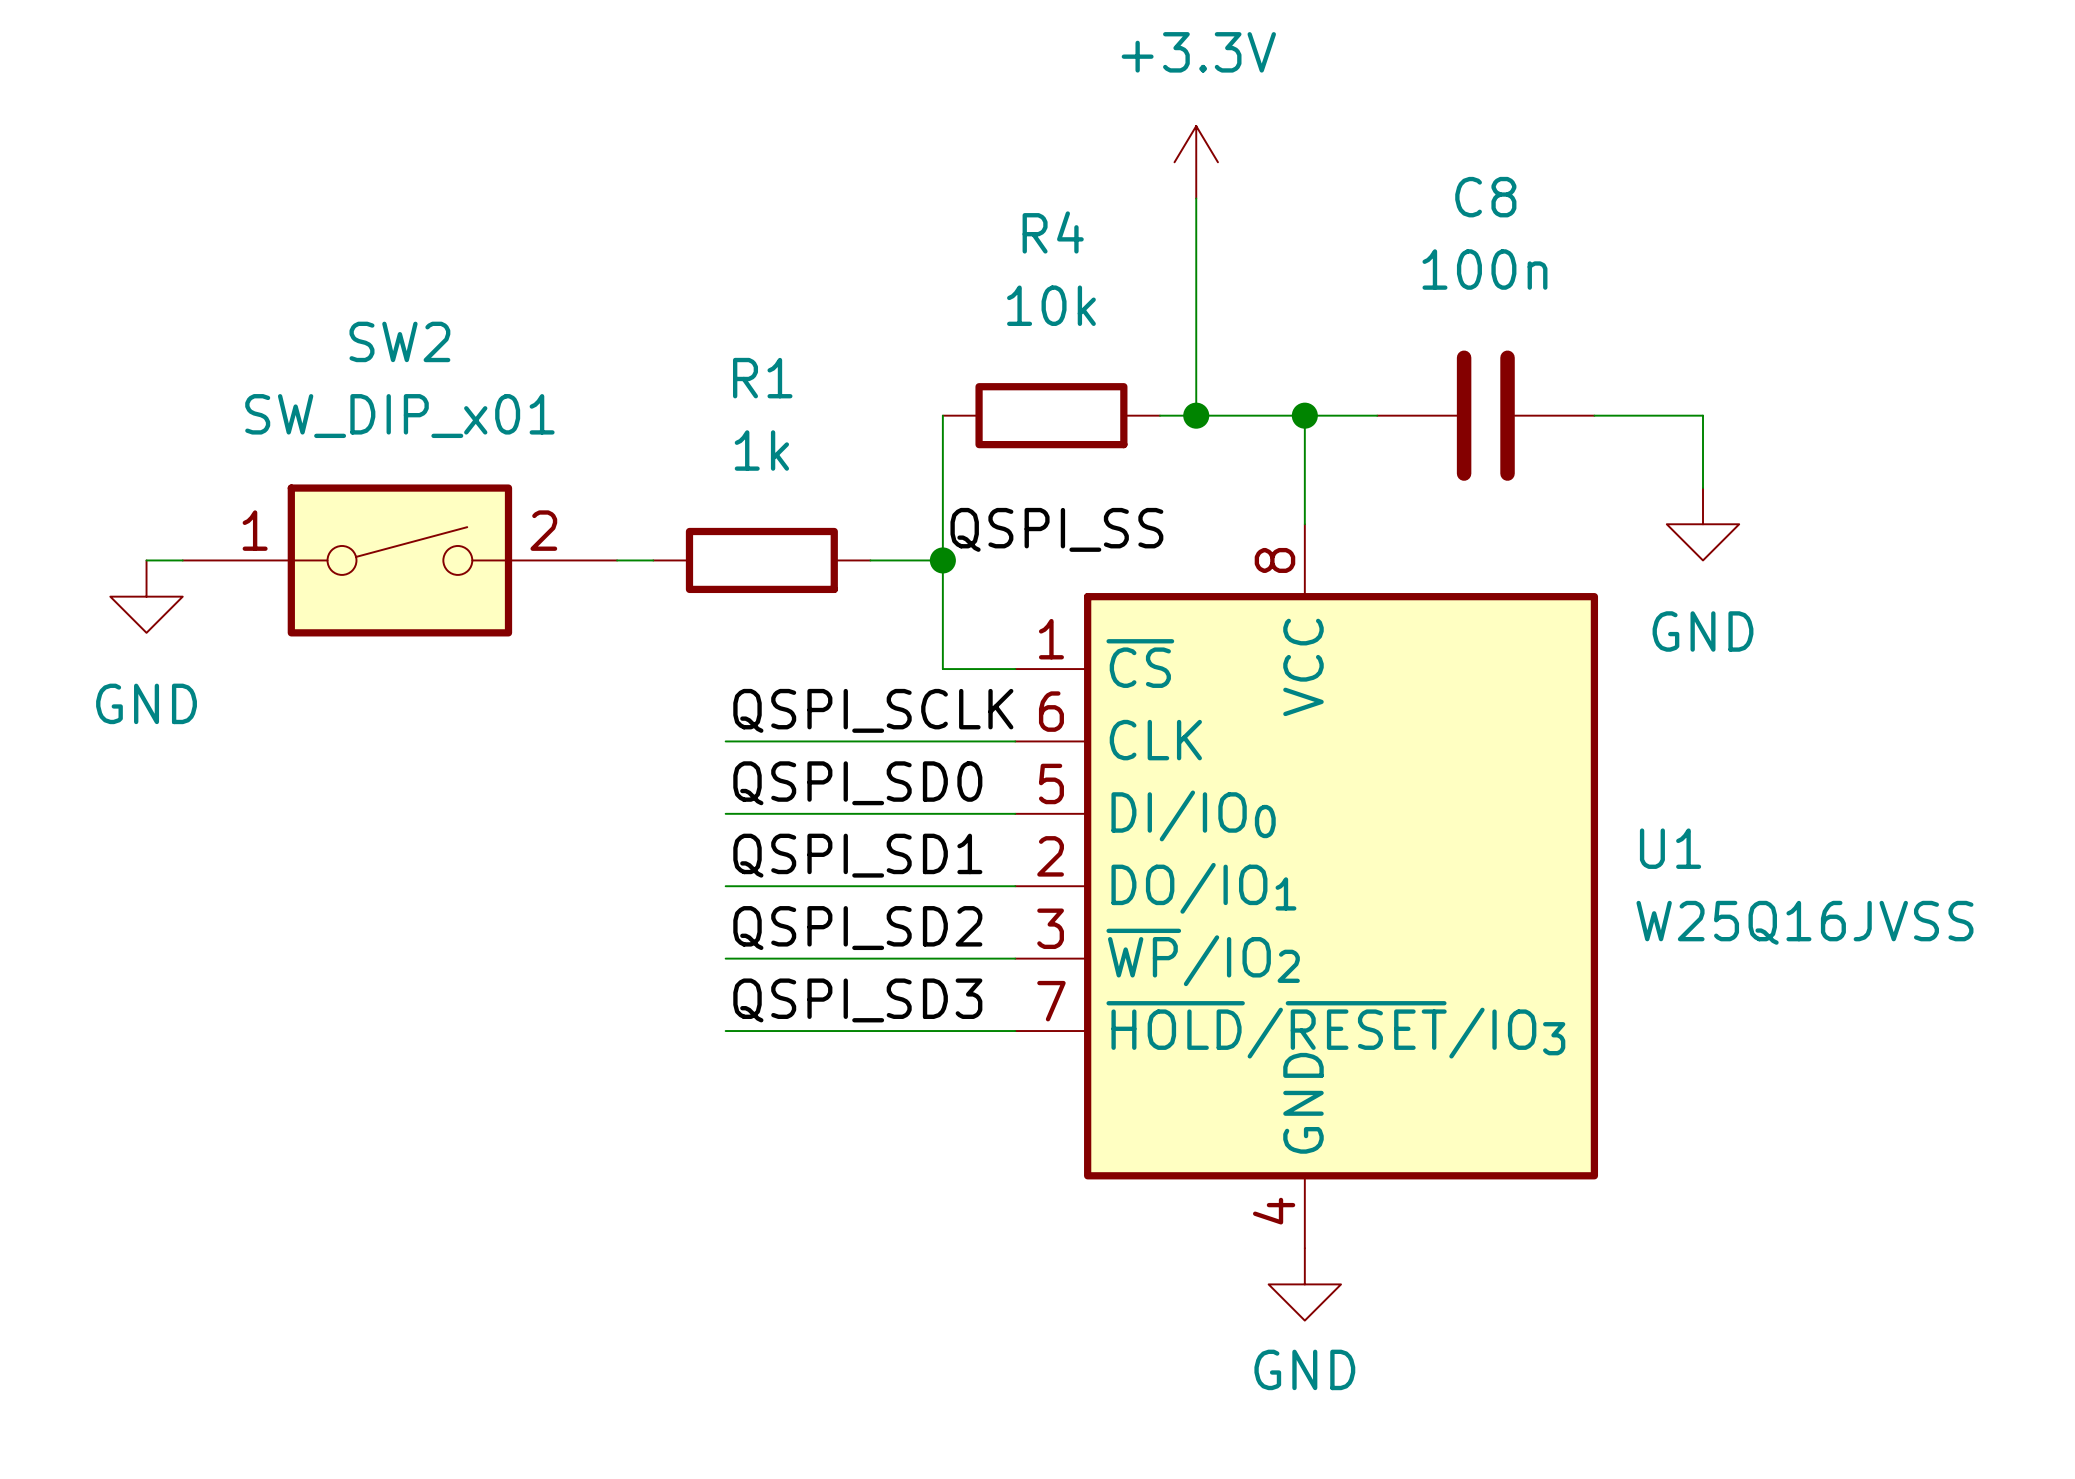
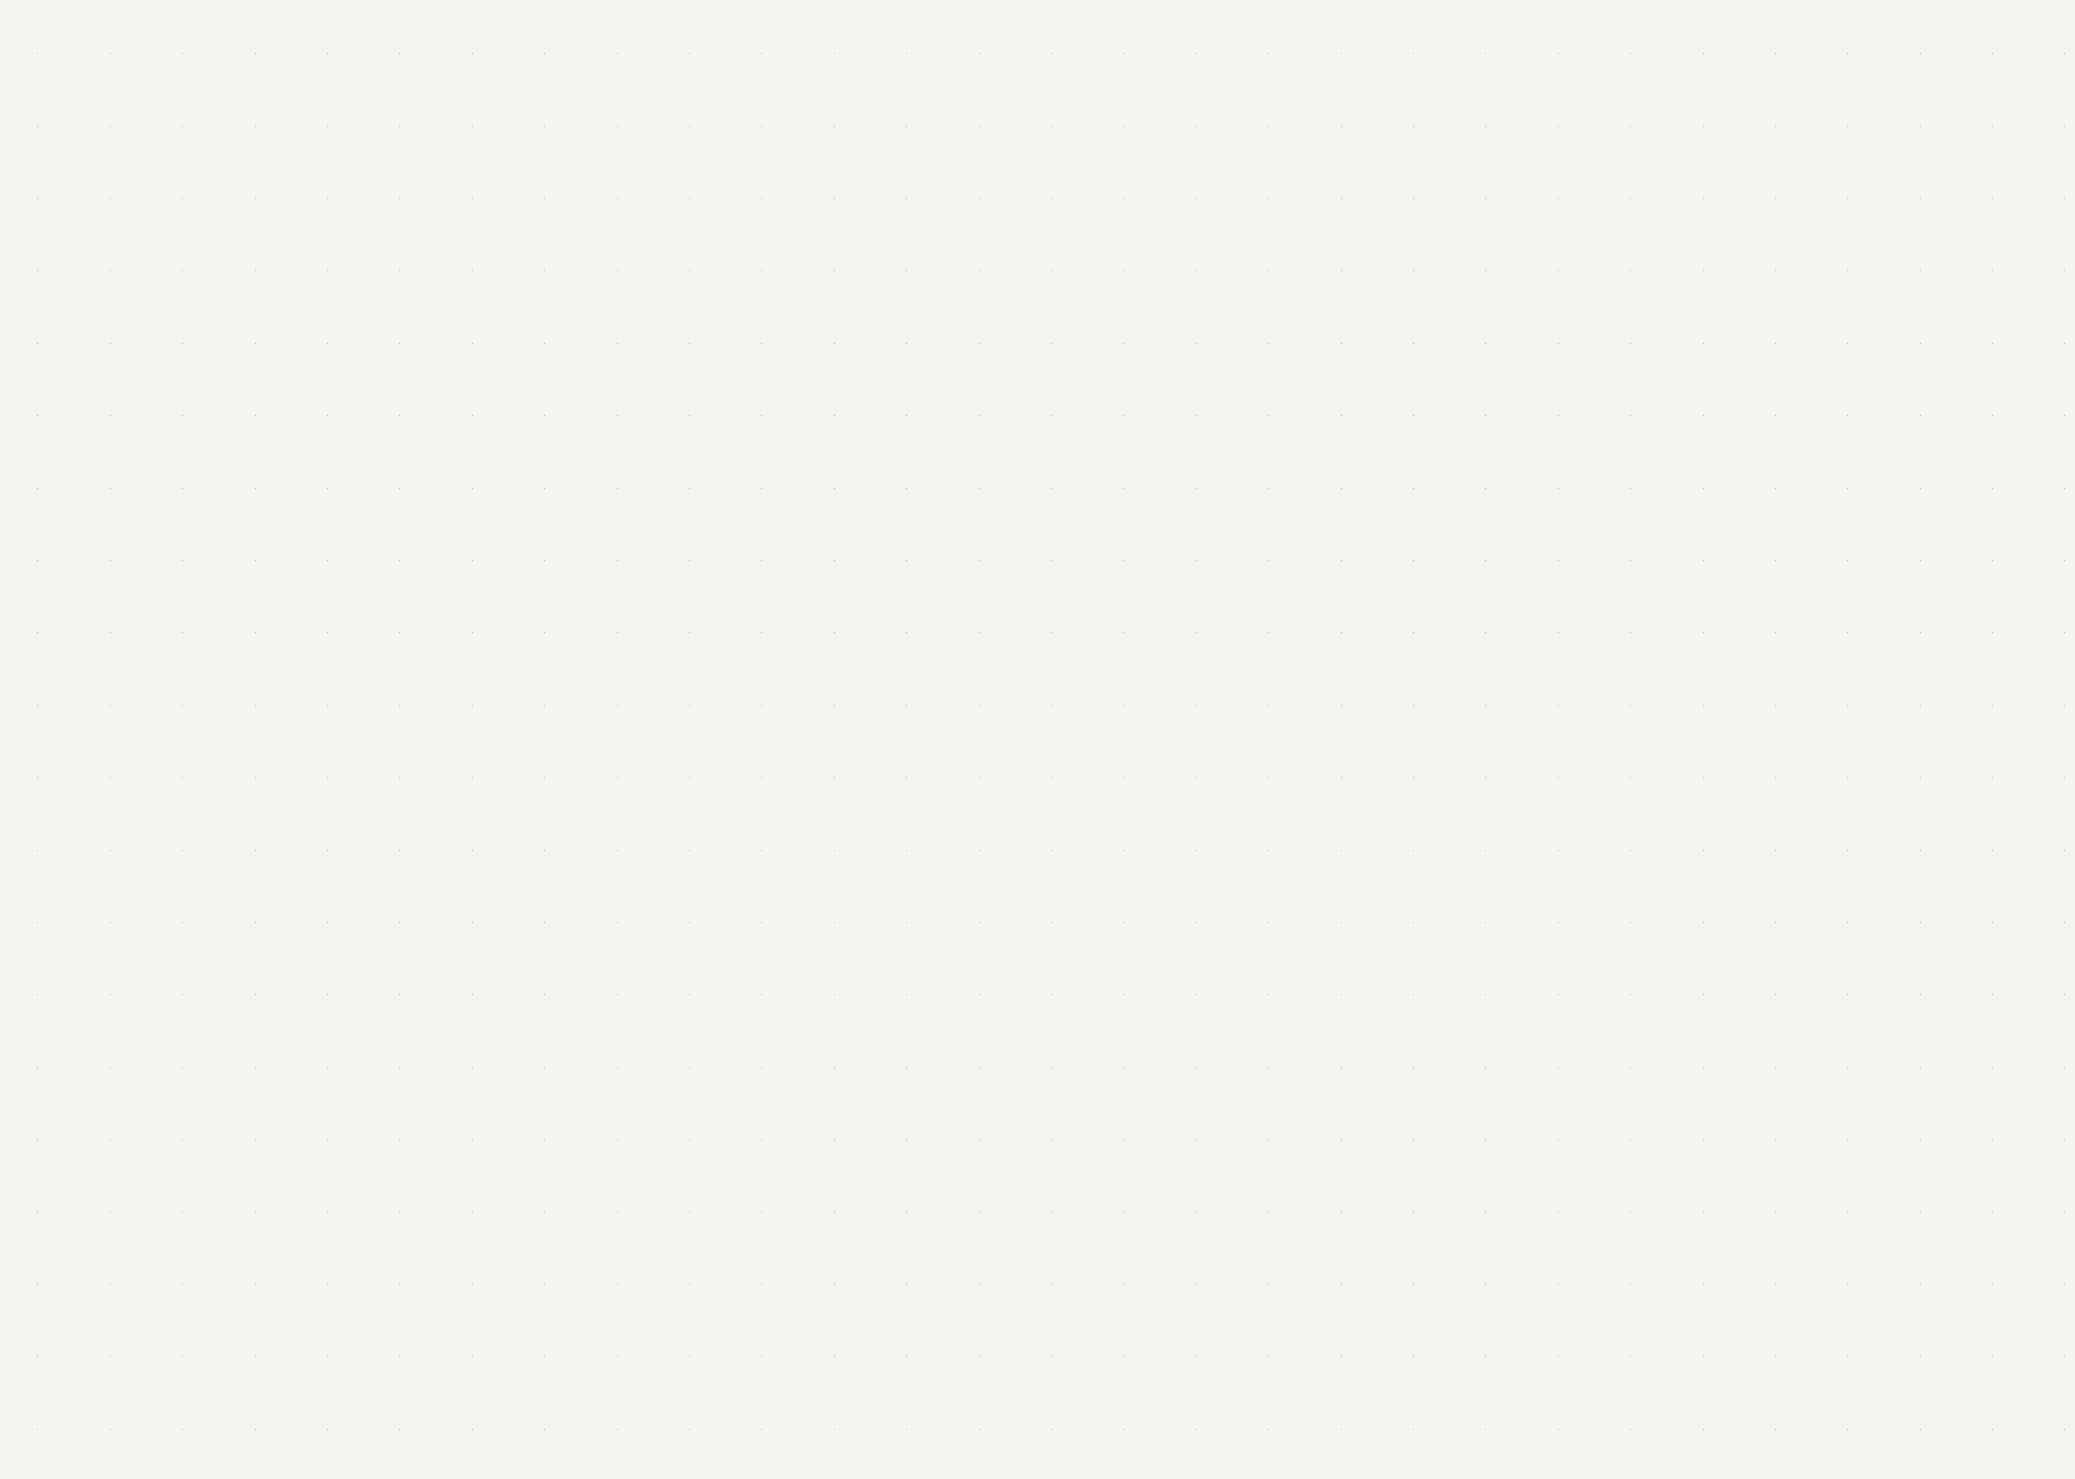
power symbol: +3.3V (1196, 162) -> none
wire: (1196, 198) (1196, 415) -> none
wire: (942, 415) (942, 669) (1015, 669) -> none
R4: 10k (1051, 415) -> none
wire: (1160, 415) (1377, 415) -> none
junction: (1196, 415) -> none
wire: (1304, 415) (1304, 524) -> none
junction: (1304, 415) -> none
C8: 100n (1485, 415) -> none
wire: (1594, 415) (1703, 415) (1703, 488) -> none
power symbol: GND (1703, 524) -> none
label: QSPI_SS (1056, 529) -> none
wire: (146, 560) (182, 560) -> none
SW2: SW_DIP_x01 (399, 560) -> none
wire: (617, 560) (653, 560) -> none
R1: 1k (761, 560) -> none
wire: (870, 560) (942, 560) -> none
junction: (942, 560) -> none
power symbol: GND (146, 596) -> none
label: QSPI_SCLK (873, 710) -> none
wire: (725, 741) (1015, 741) -> none
label: QSPI_SD0 (857, 783) -> none
wire: (725, 813) (1015, 813) -> none
label: QSPI_SD1 (857, 855) -> none
wire: (725, 886) (1015, 886) -> none
U1: W25Q16JVSS (1306, 886) -> none
label: QSPI_SD2 (857, 928) -> none
wire: (725, 958) (1015, 958) -> none
label: QSPI_SD3 (857, 1000) -> none
wire: (725, 1031) (1015, 1031) -> none
power symbol: GND (1304, 1284) -> none

